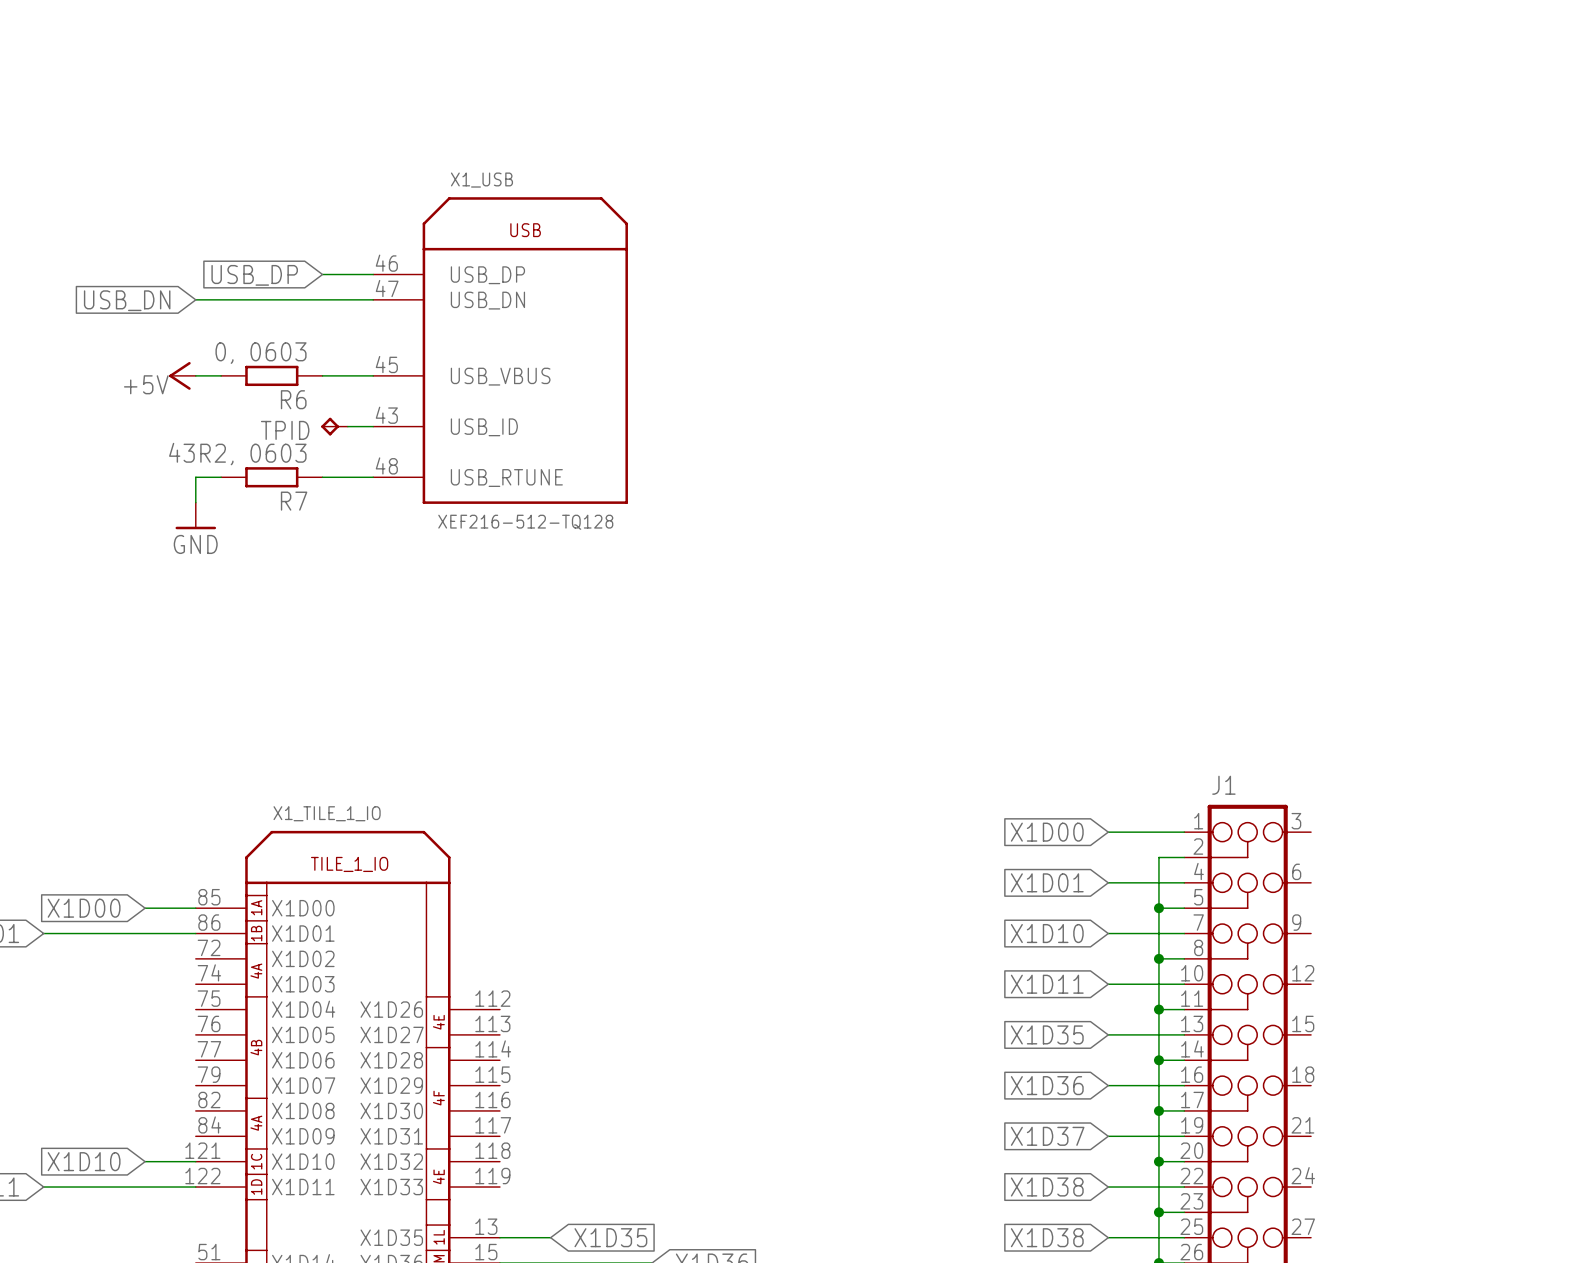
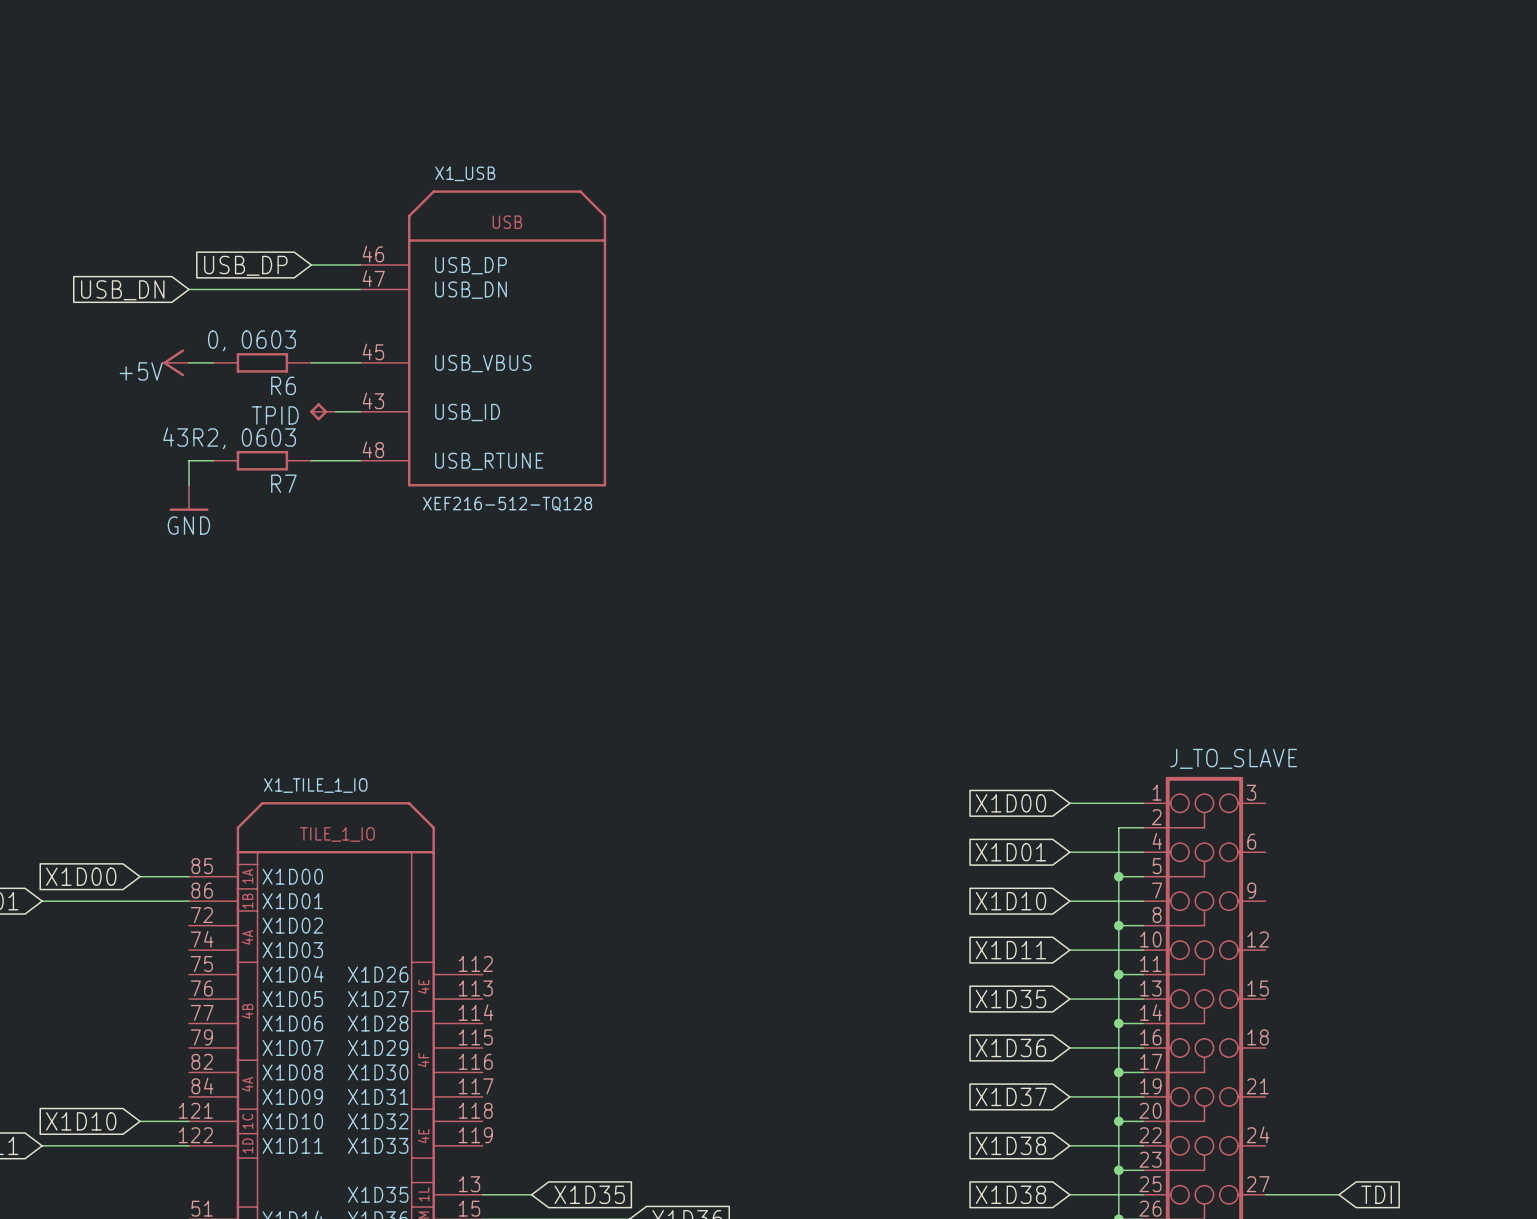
J1 name: J1 (1223, 785) -> J_TO_SLAVE (1233, 758)
wire: none -> (1265, 1194) (1339, 1194)
global label: none -> TDI (1376, 1194)

